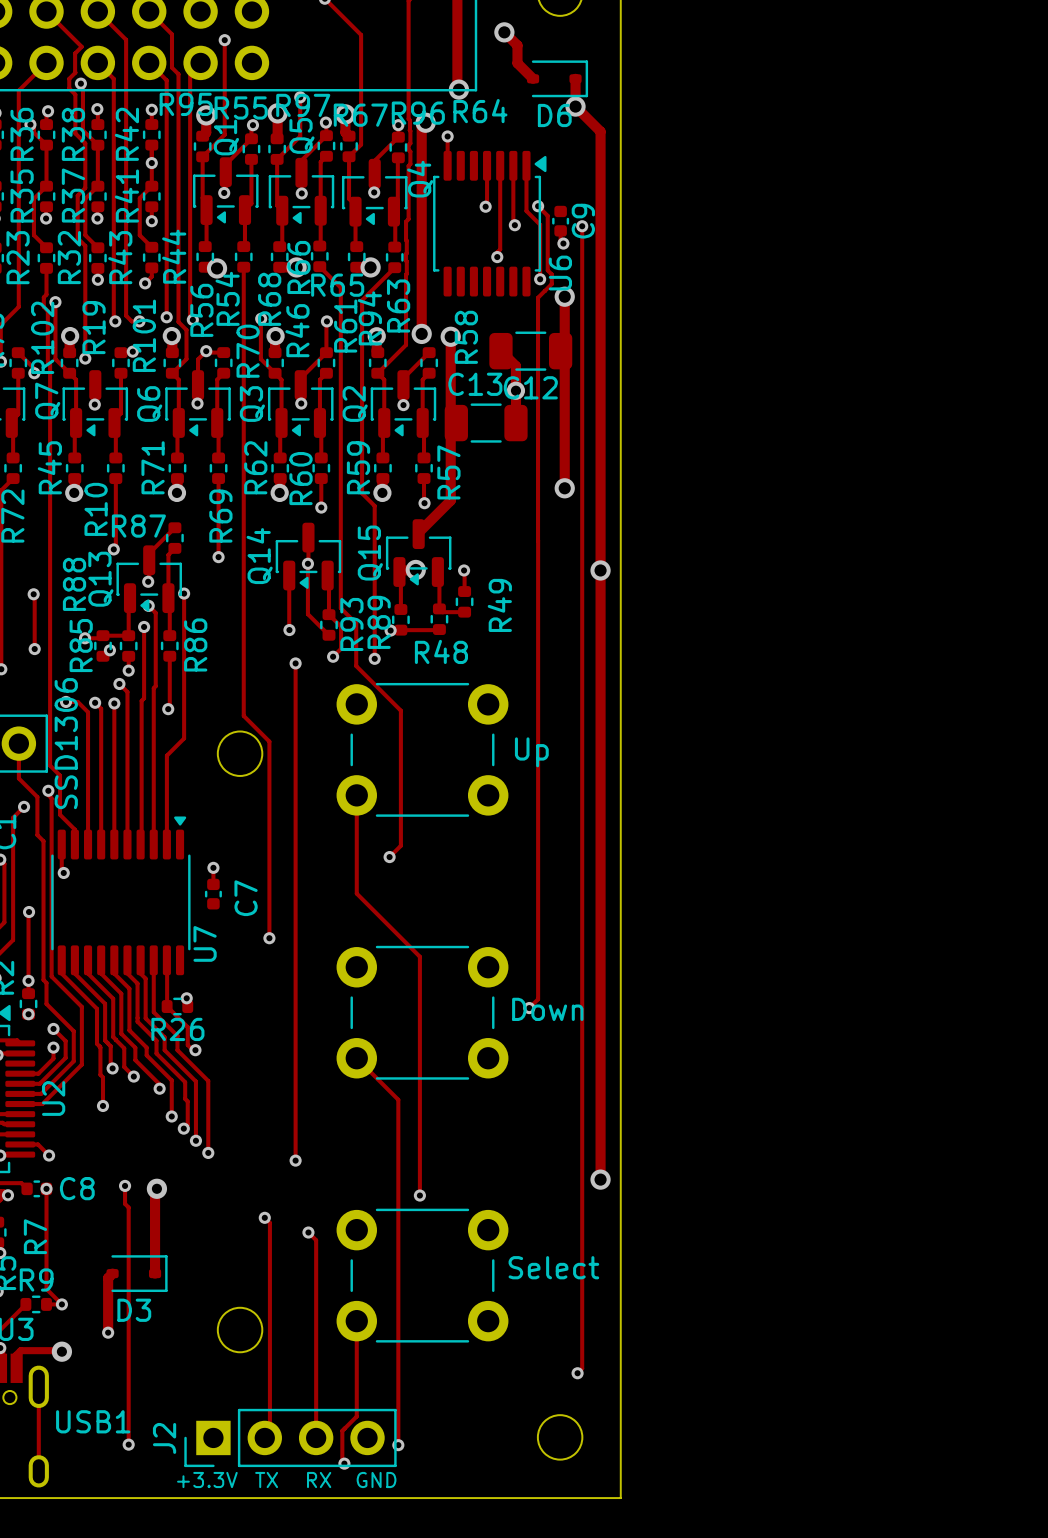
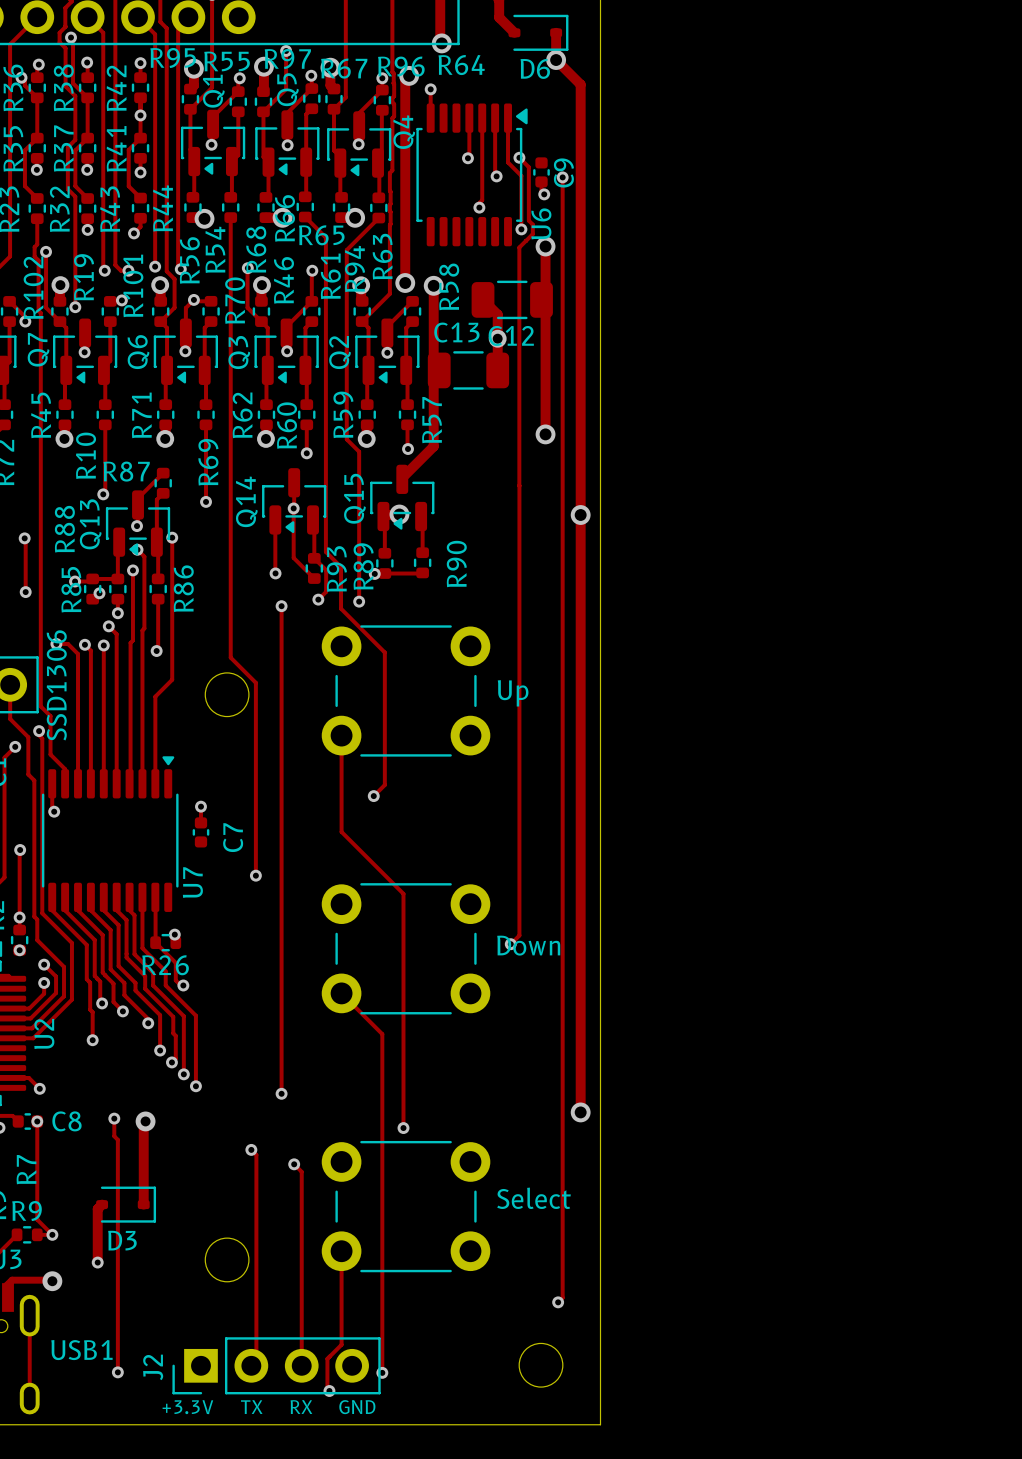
track: (464, 570) (464, 591) -> none
via: (464, 570) -> none
R49: (464, 601) -> none
track: (439, 608) (442, 612) (464, 612) -> none
R48 name: R48 (441, 651) -> R90 (456, 564)

